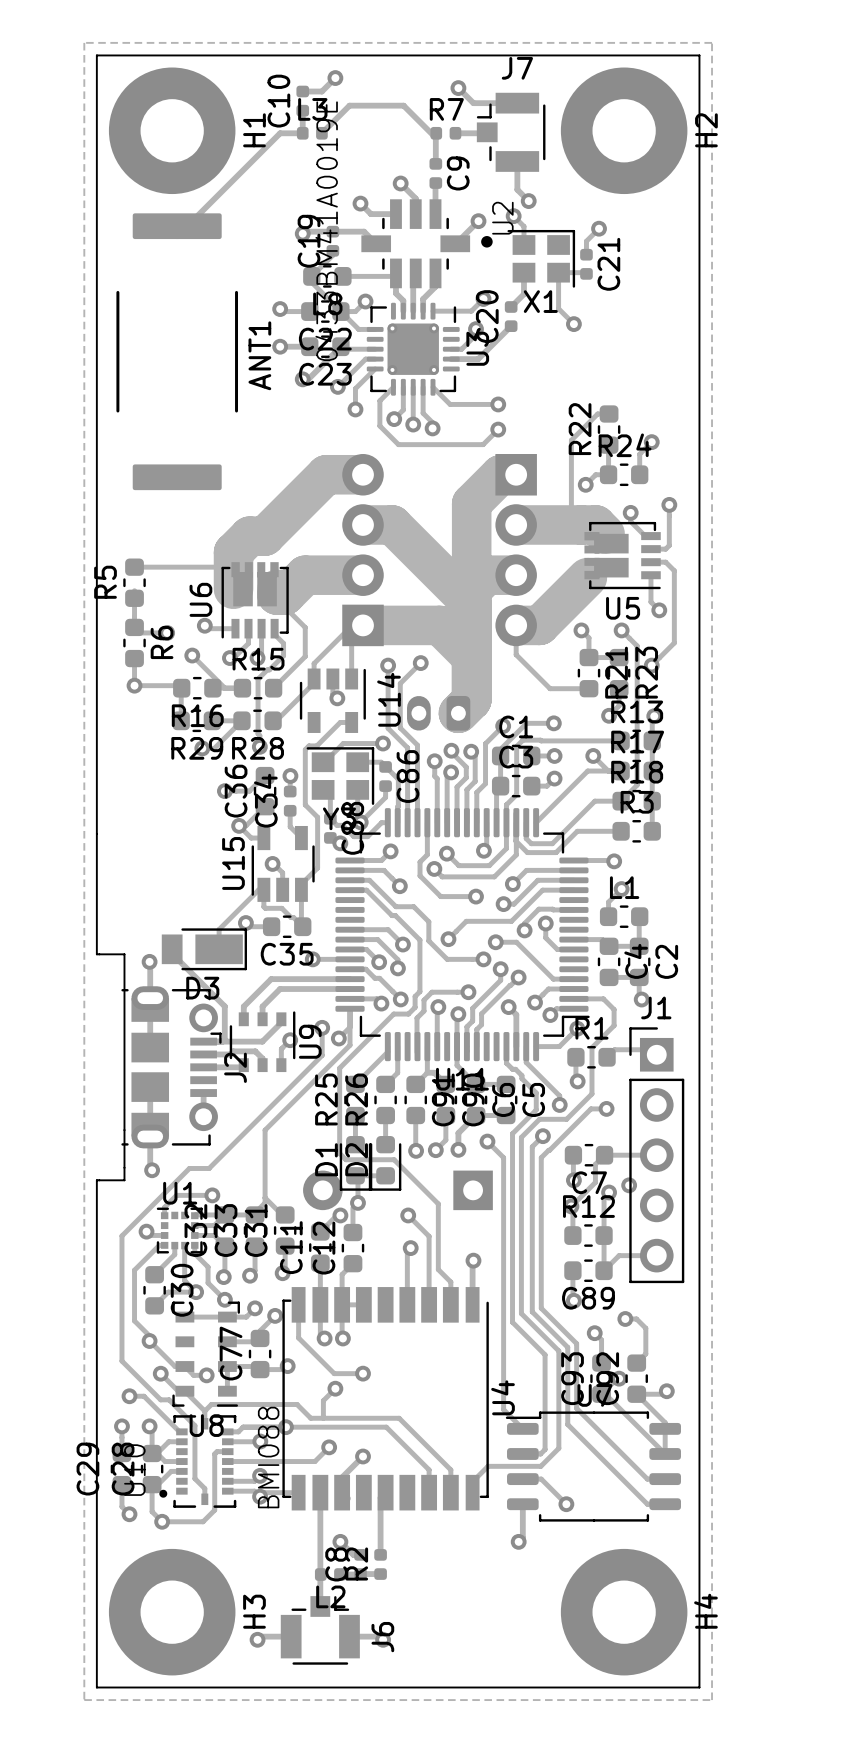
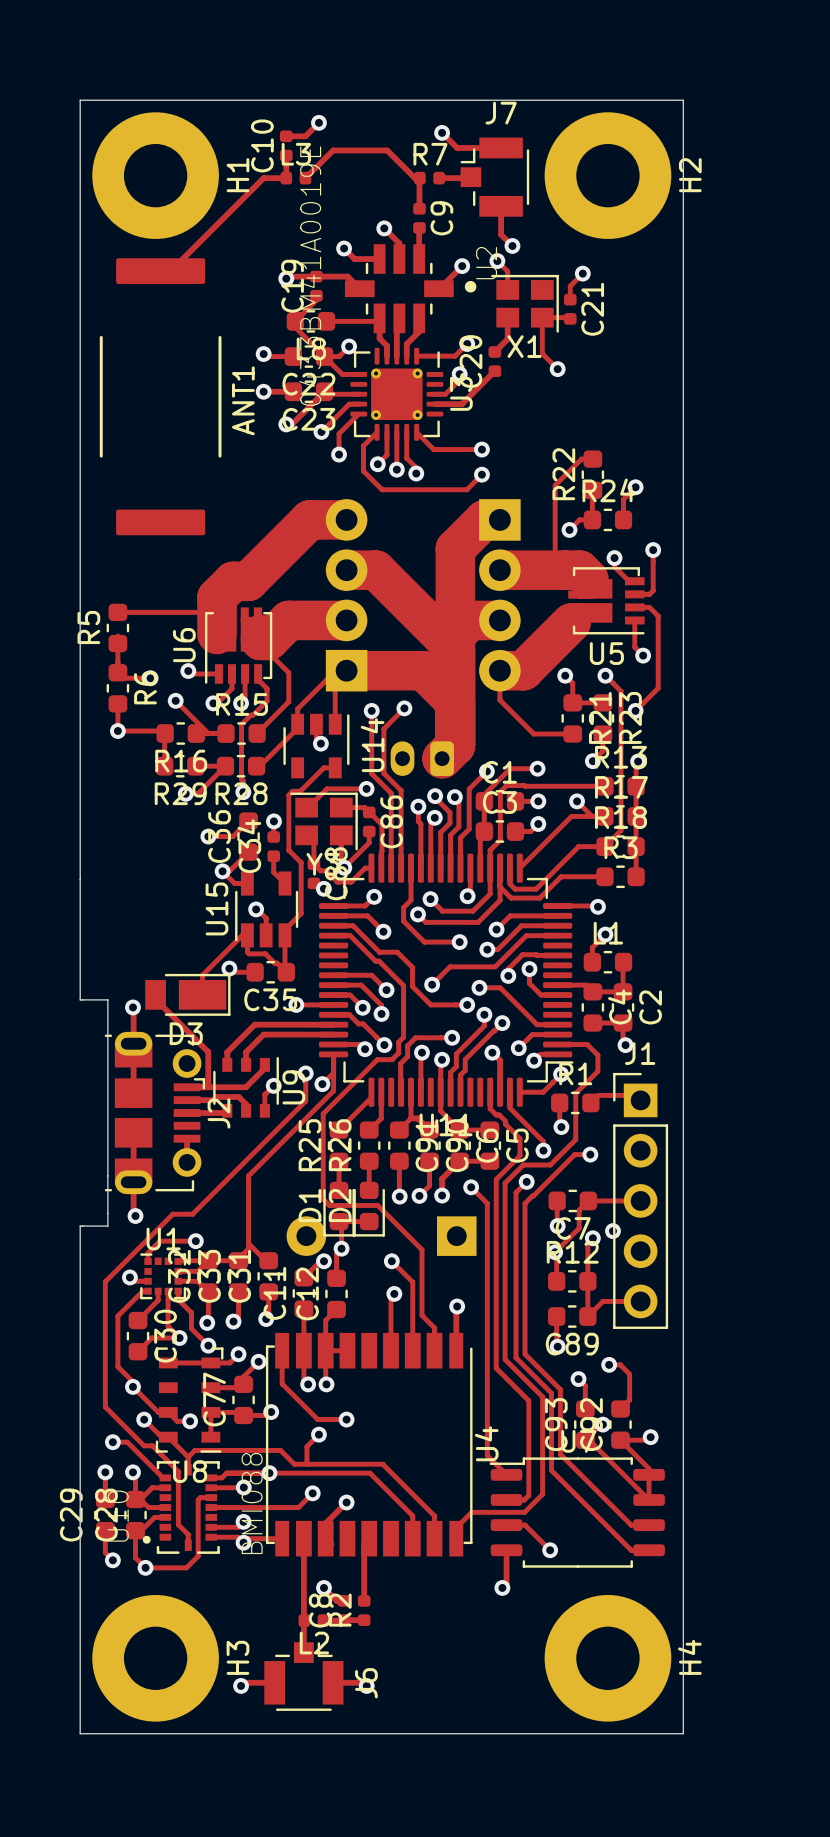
zone outline: (84, 42) (84, 1700) (712, 1700) (712, 42) (84, 42) -> none

